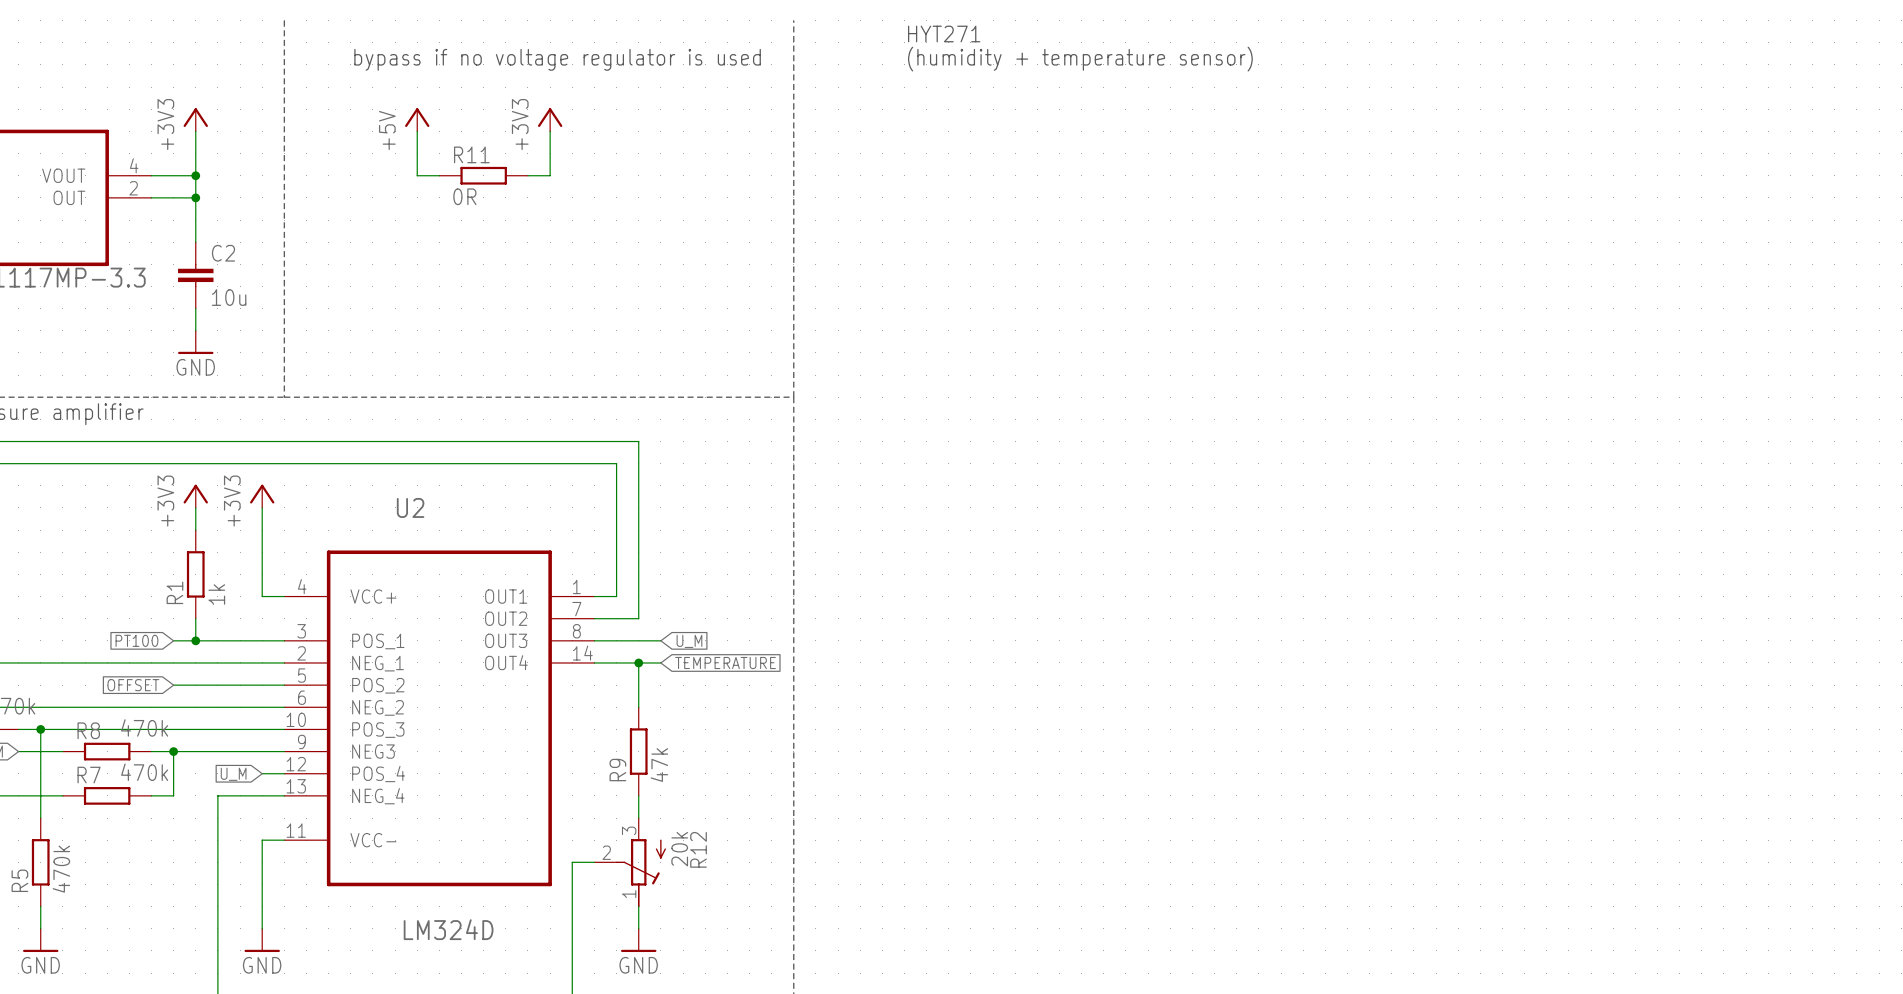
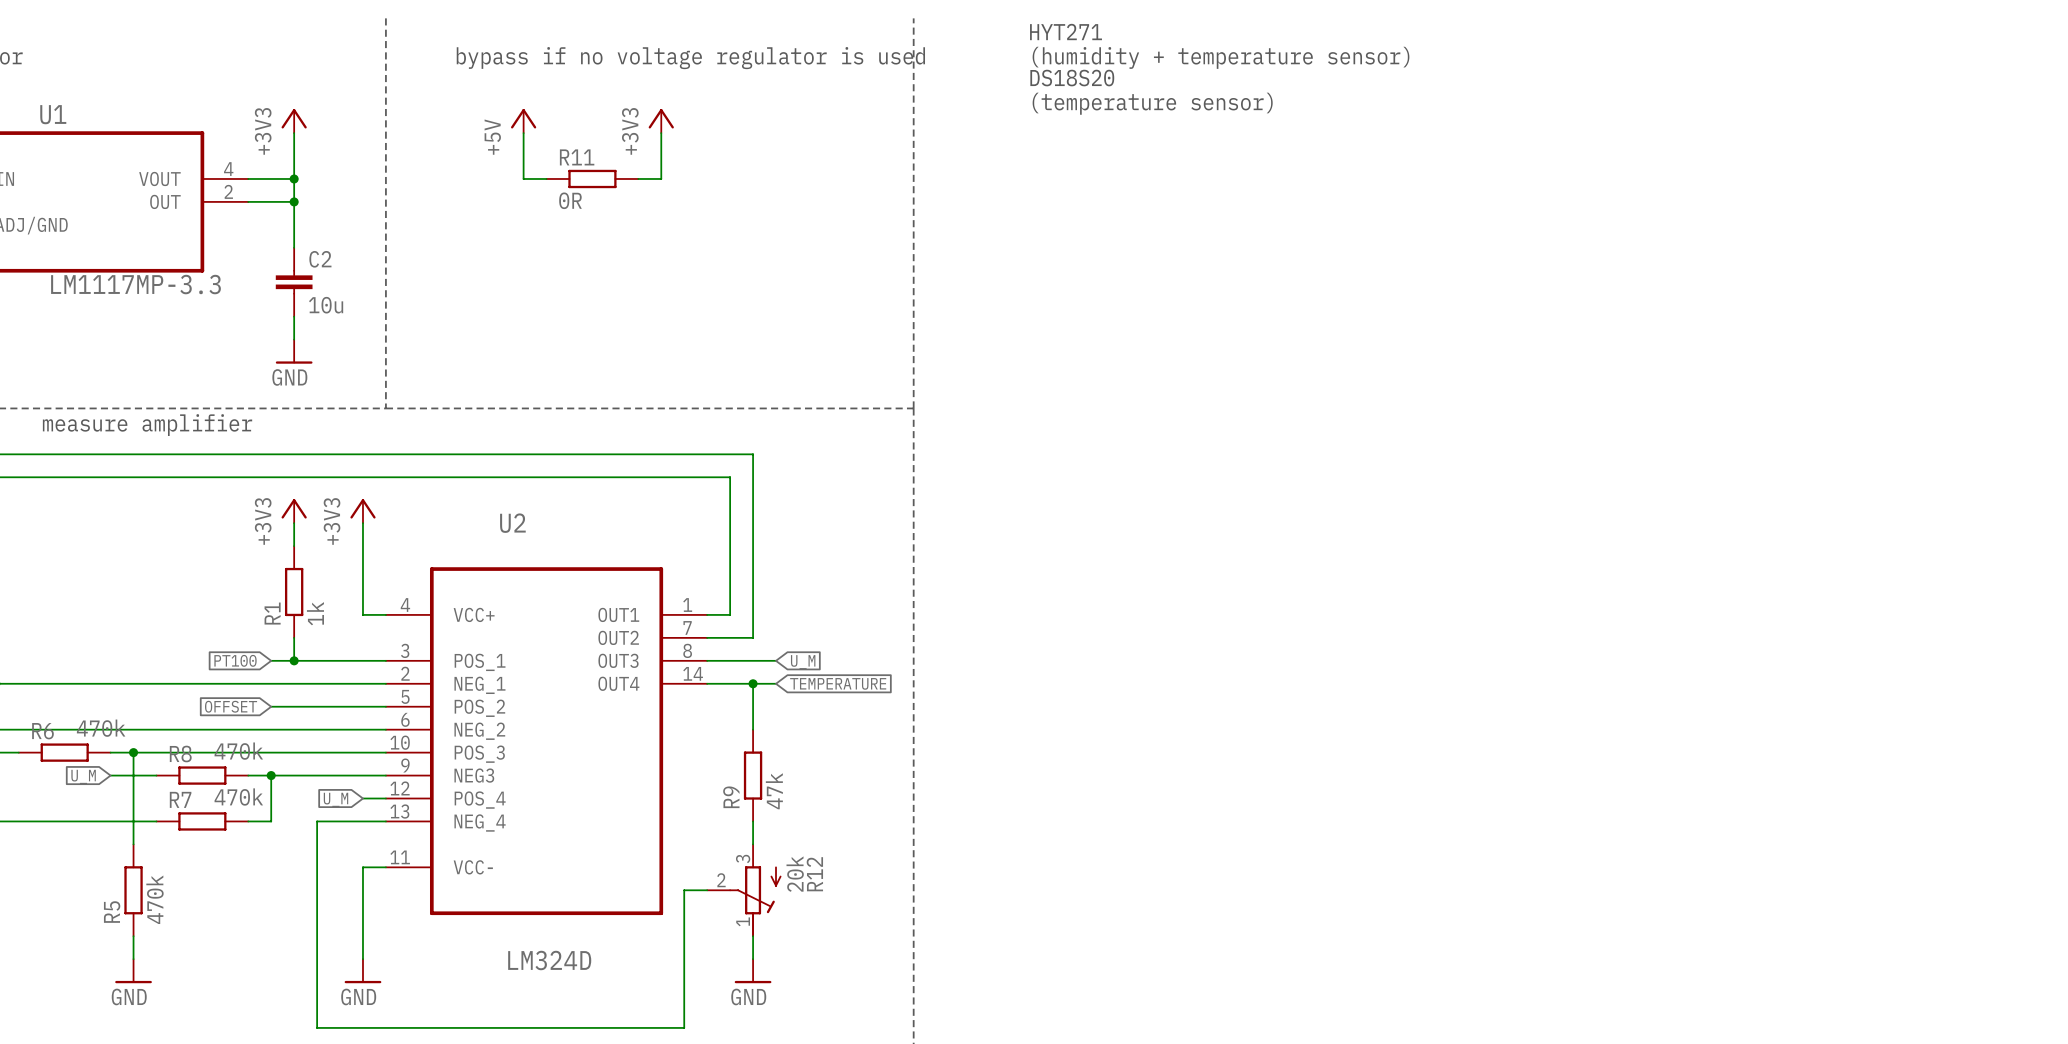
text: none -> DS18S20 (1072, 78)
text: none -> (temperature sensor) (1152, 103)

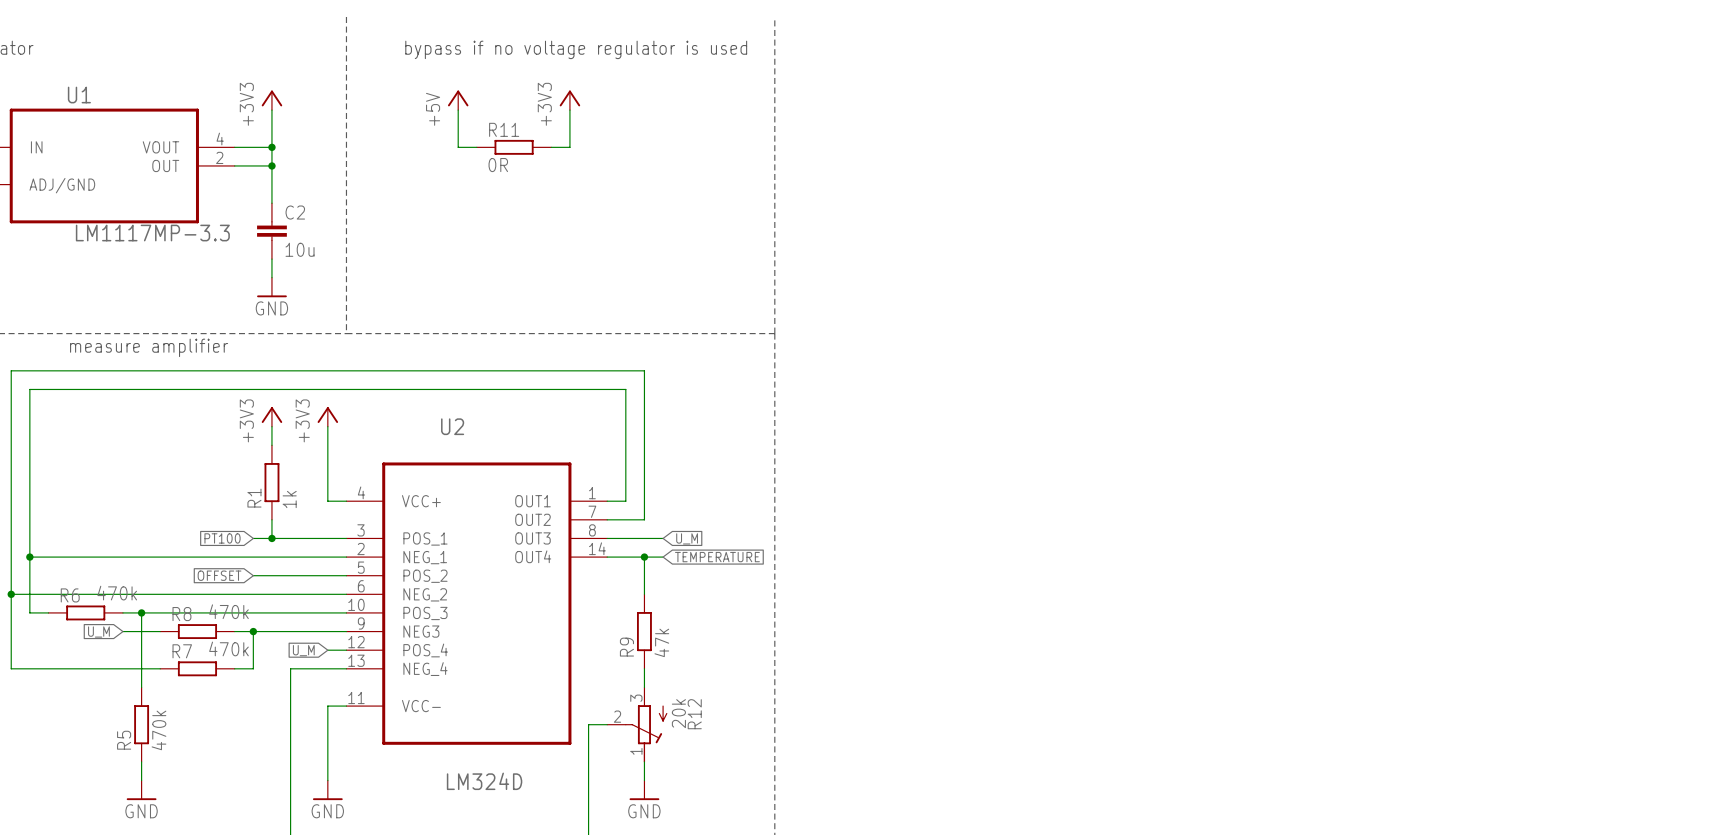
text: HYT271 (1066, 32) -> none
text: (humidity + temperature sensor) (1221, 57) -> none
text: DS18S20 (1072, 78) -> none
text: (temperature sensor) (1152, 103) -> none

